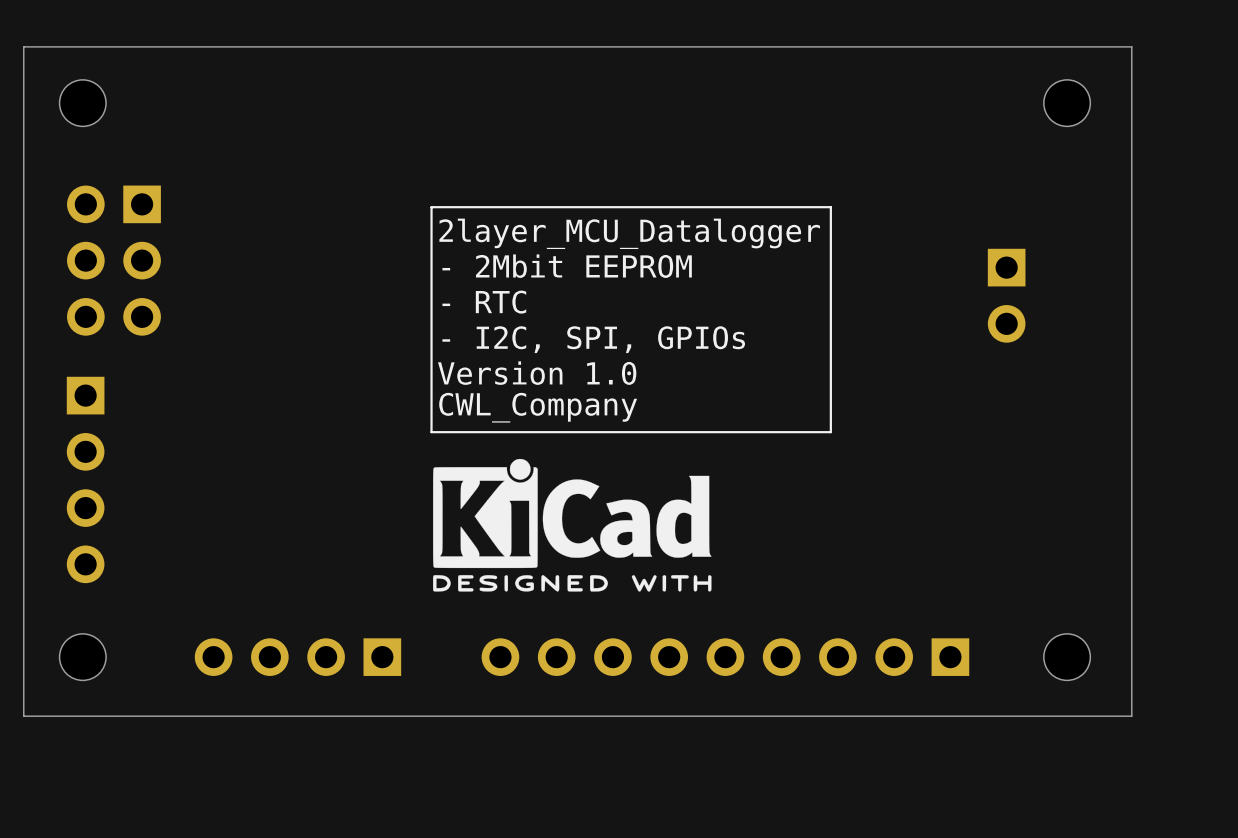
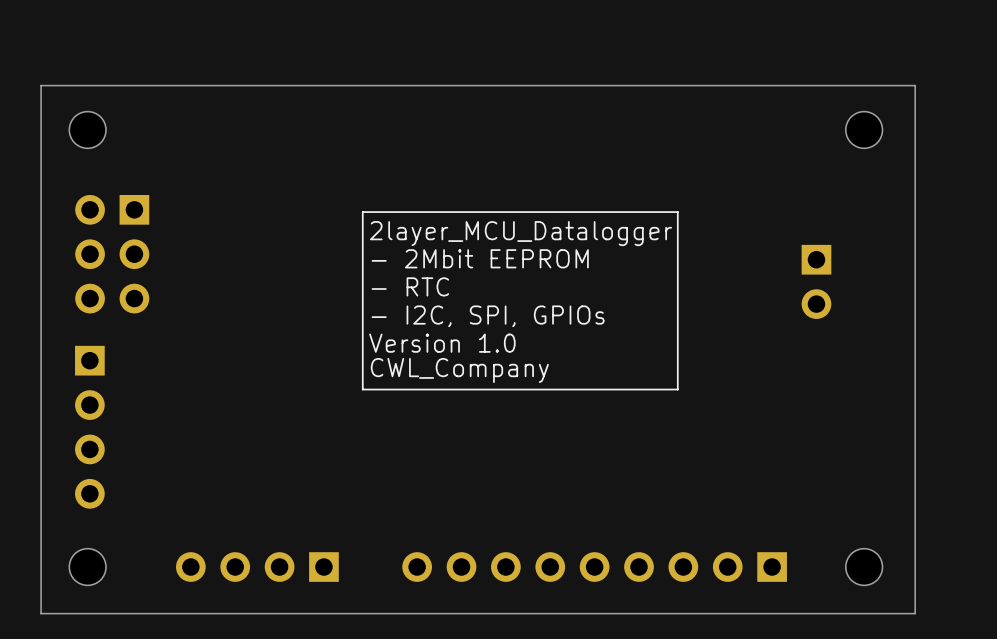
drawing: [433, 458, 712, 592] -> none

